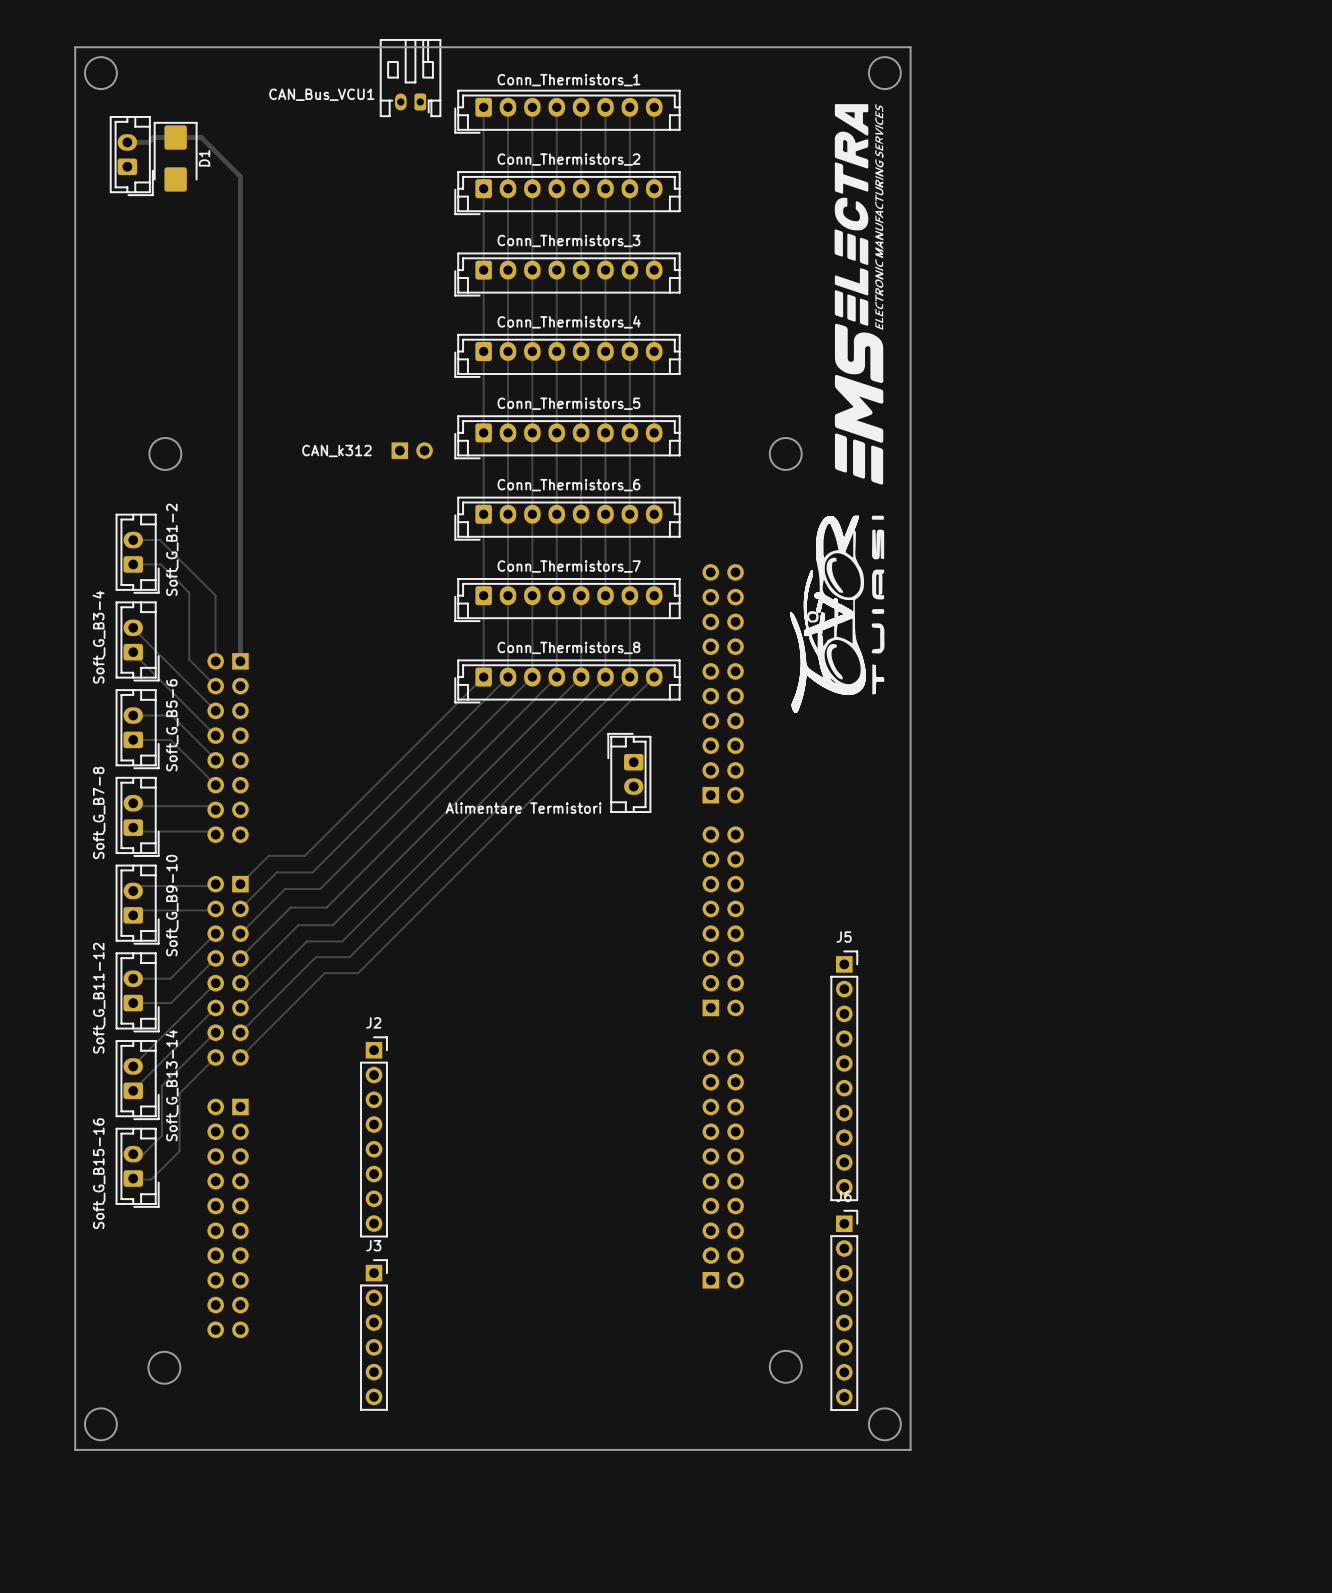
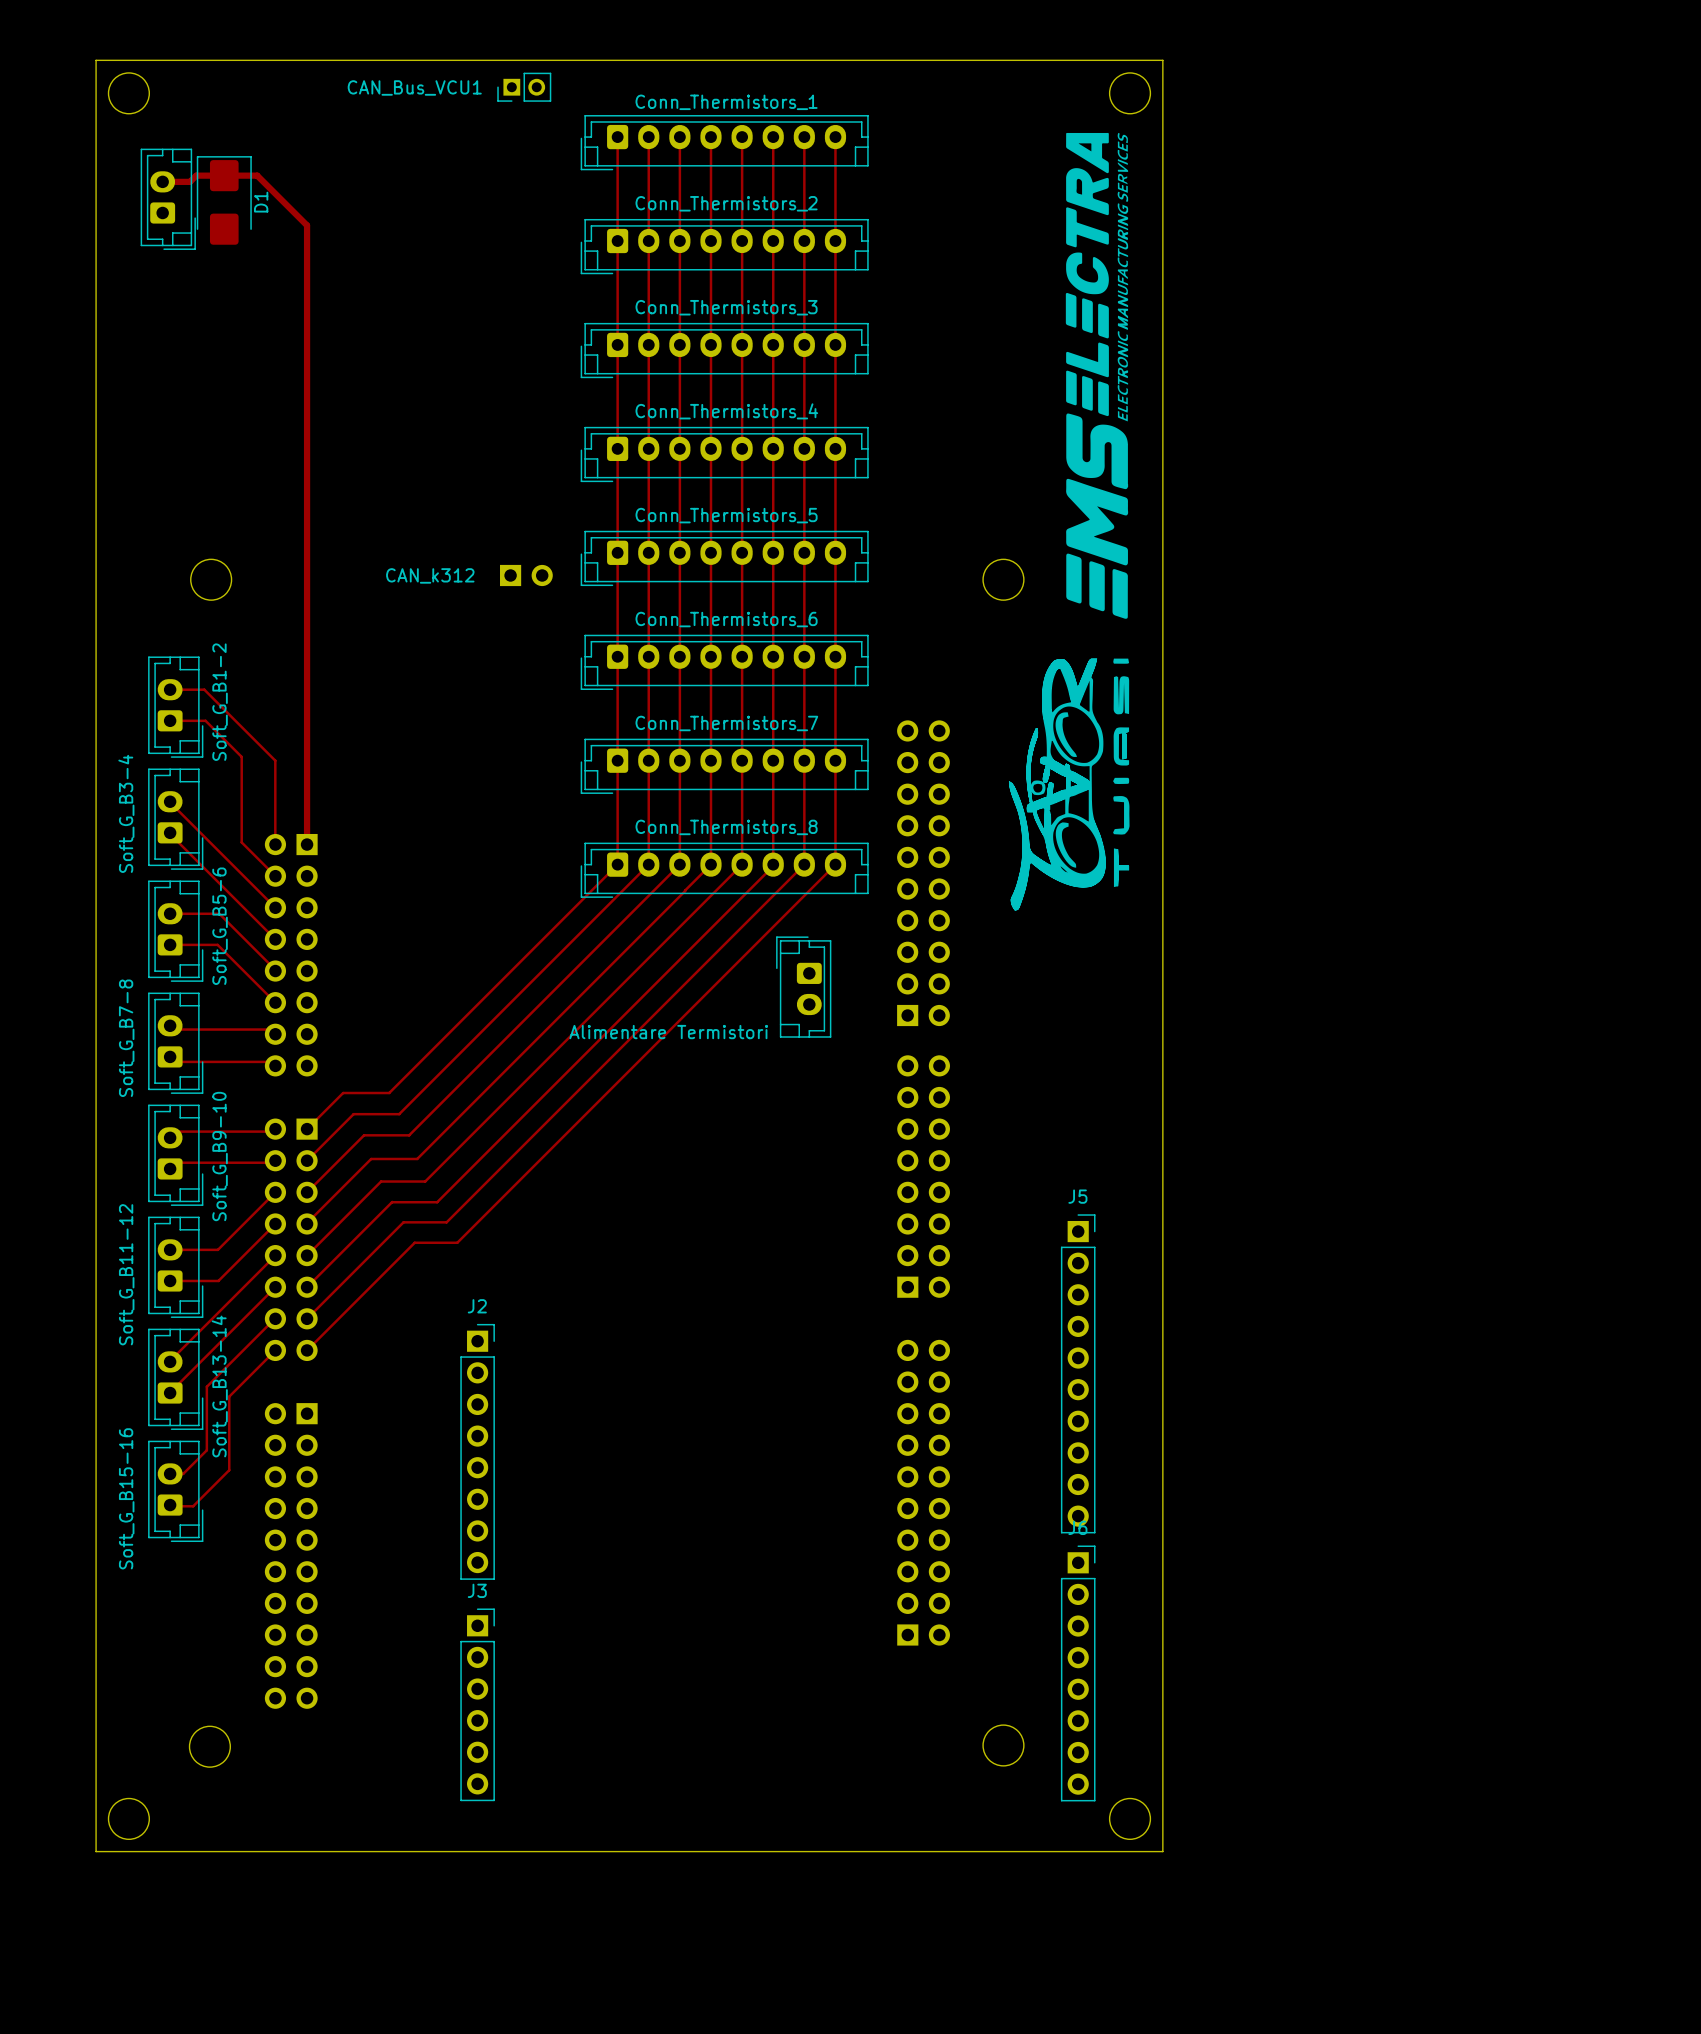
CAN_Bus_VCU1 footprint: [380, 39, 441, 117] -> [497, 72, 552, 102]

